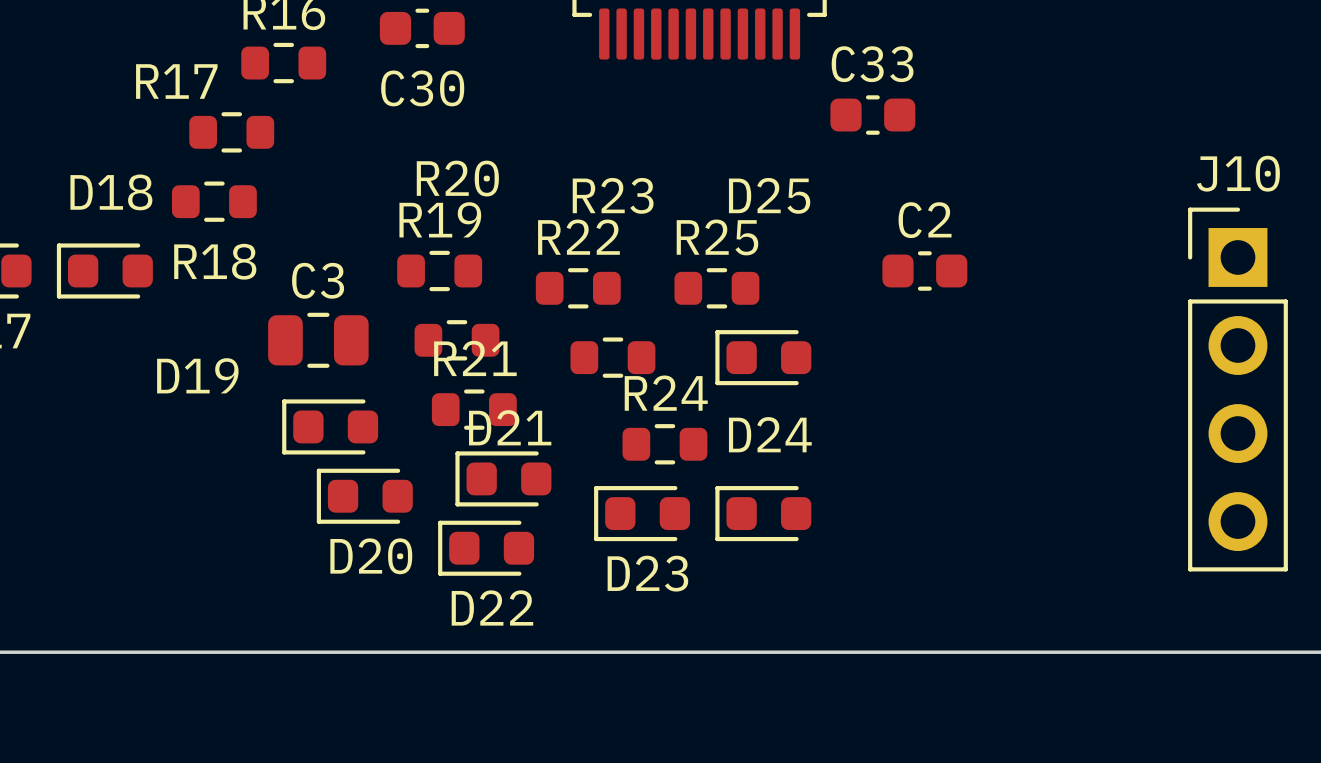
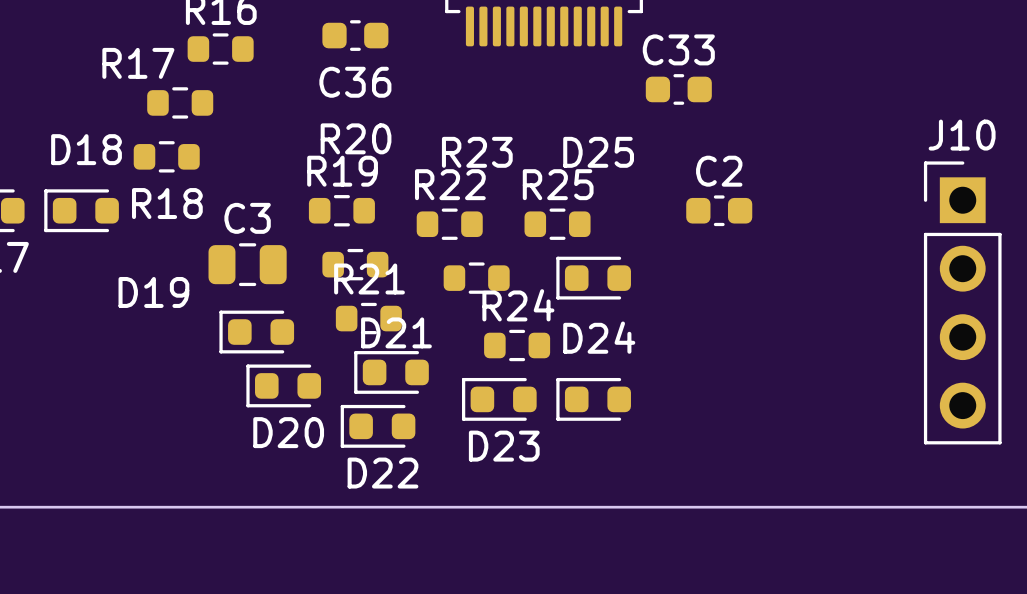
C30: (422, 28) -> none
C36: none -> (355, 35)

